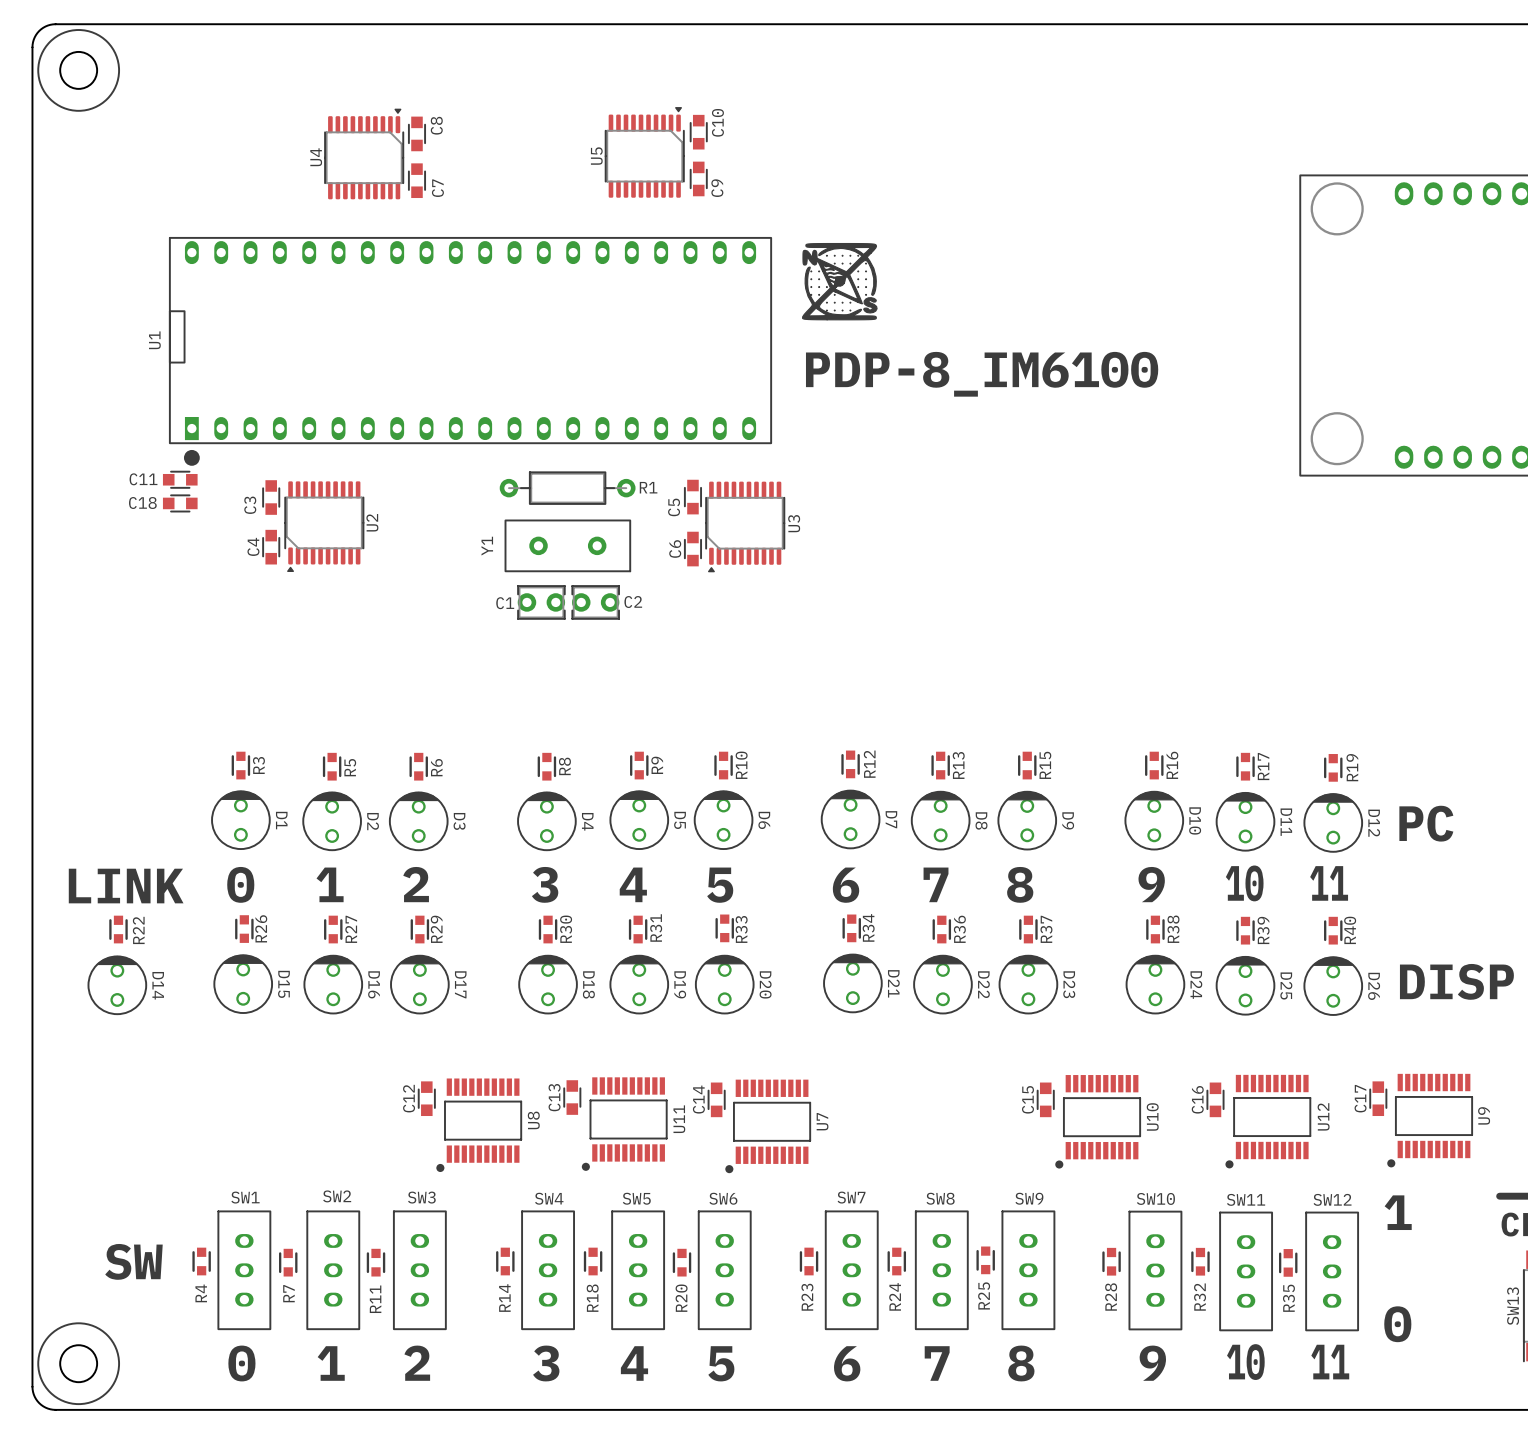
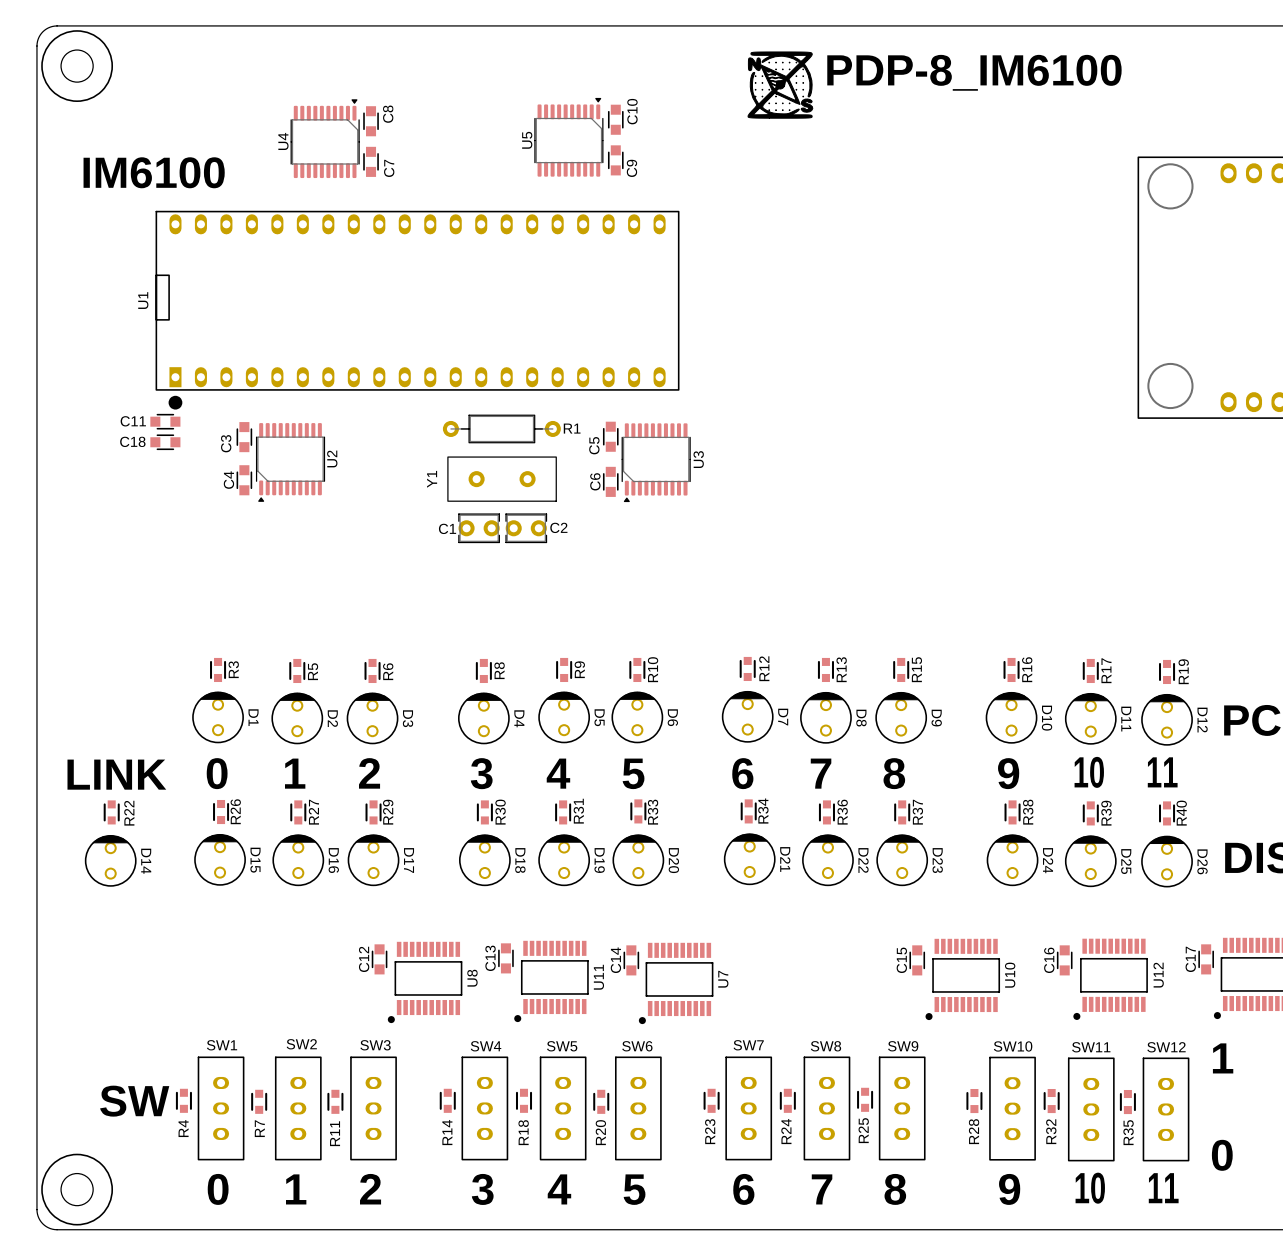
text: none -> PDP-8_IM6100 (974, 72)
text: none -> IM6100 (154, 172)
drawing position: (839, 281) -> (780, 85)
text: PDP-8_IM6100 (982, 374) -> none

